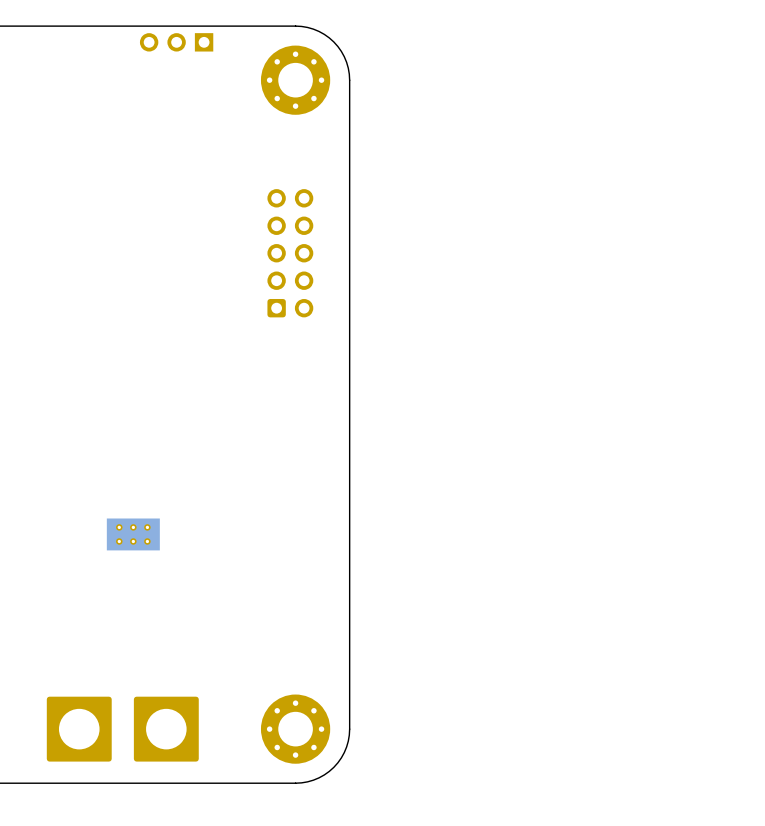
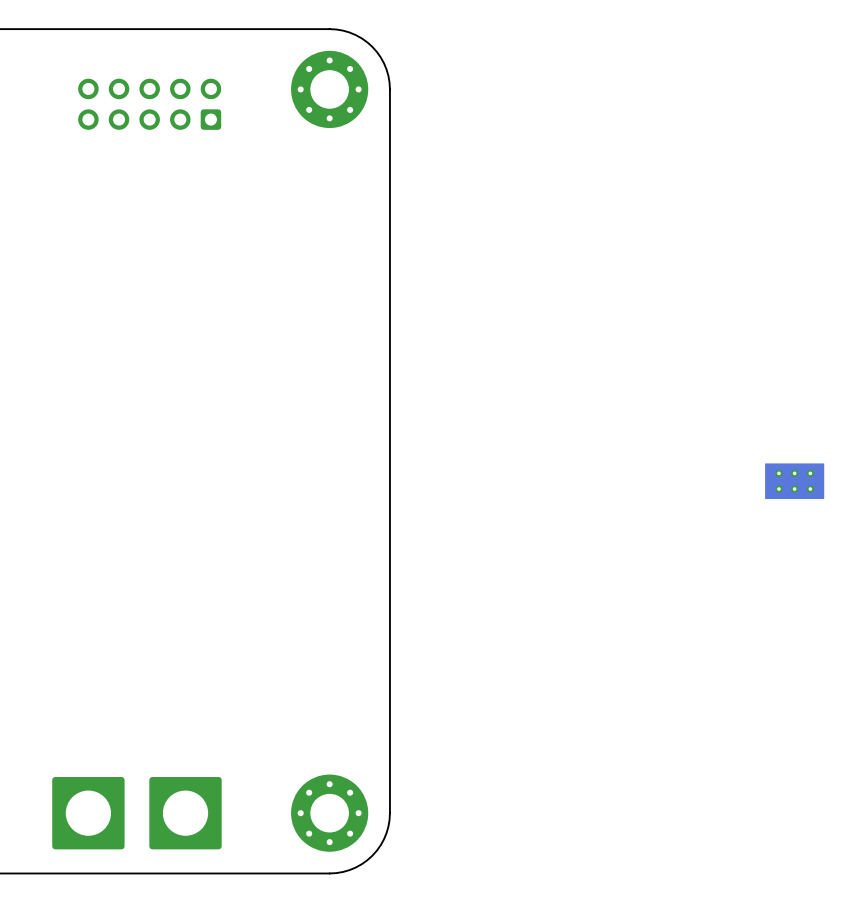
part: (176, 42) -> none
part rotation: 0° (290, 253) -> 90° counterclockwise (149, 104)
part position: (290, 253) -> (149, 104)
part: none -> (794, 481)
part: (133, 534) -> none

